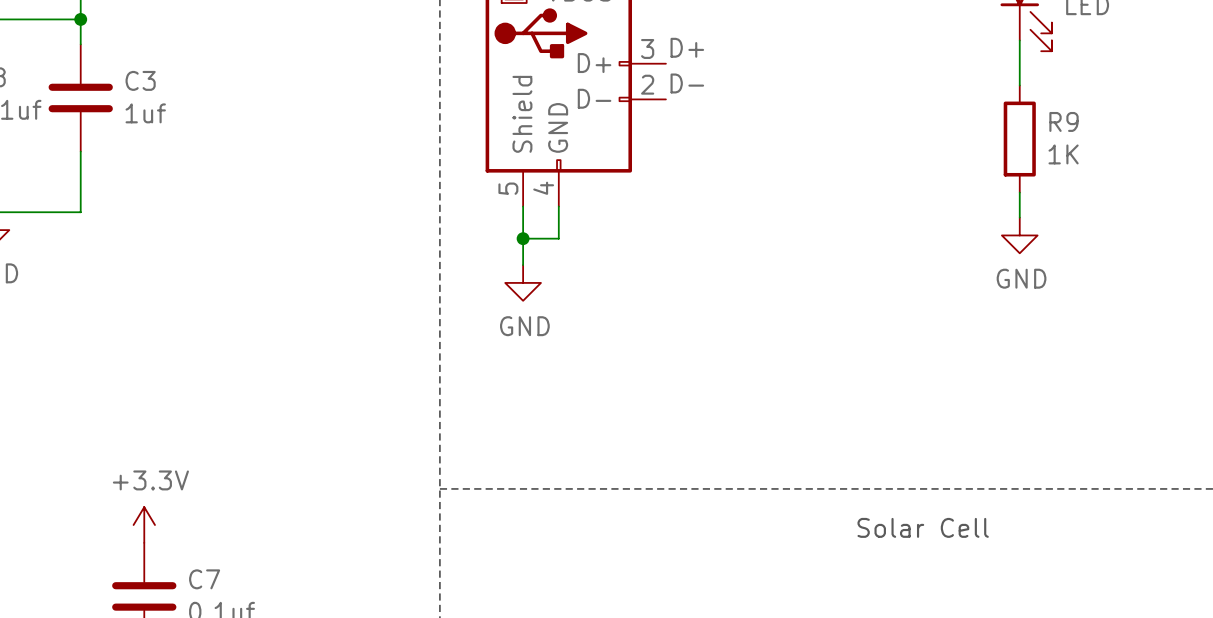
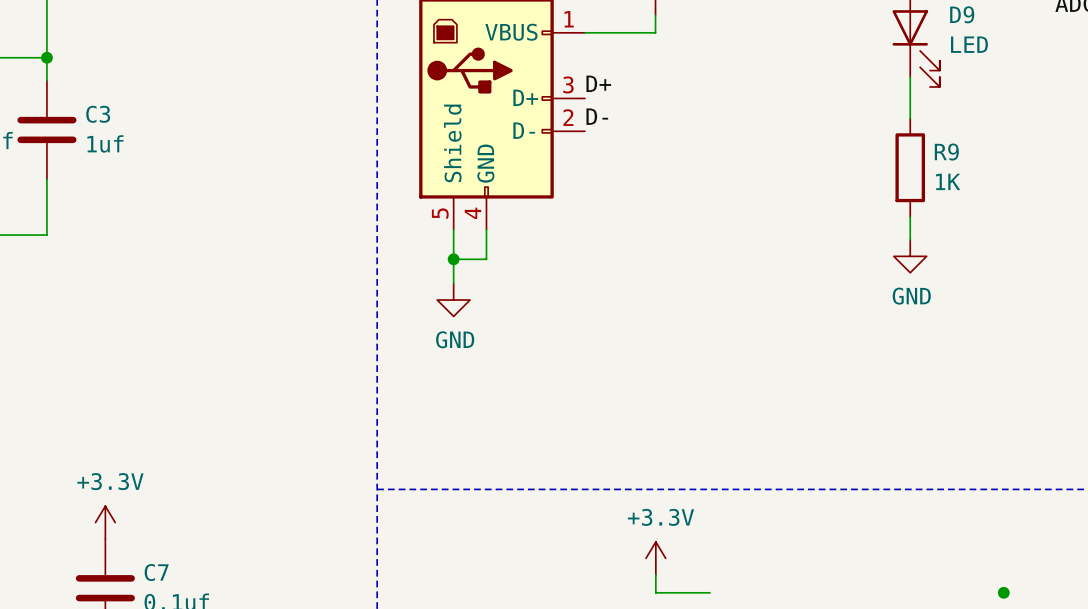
text: Solar Cell (923, 527) -> none
power symbol: none -> +3.3V (655, 558)
wire: none -> (655, 574) (655, 592) (710, 592)
junction: none -> (1003, 592)

